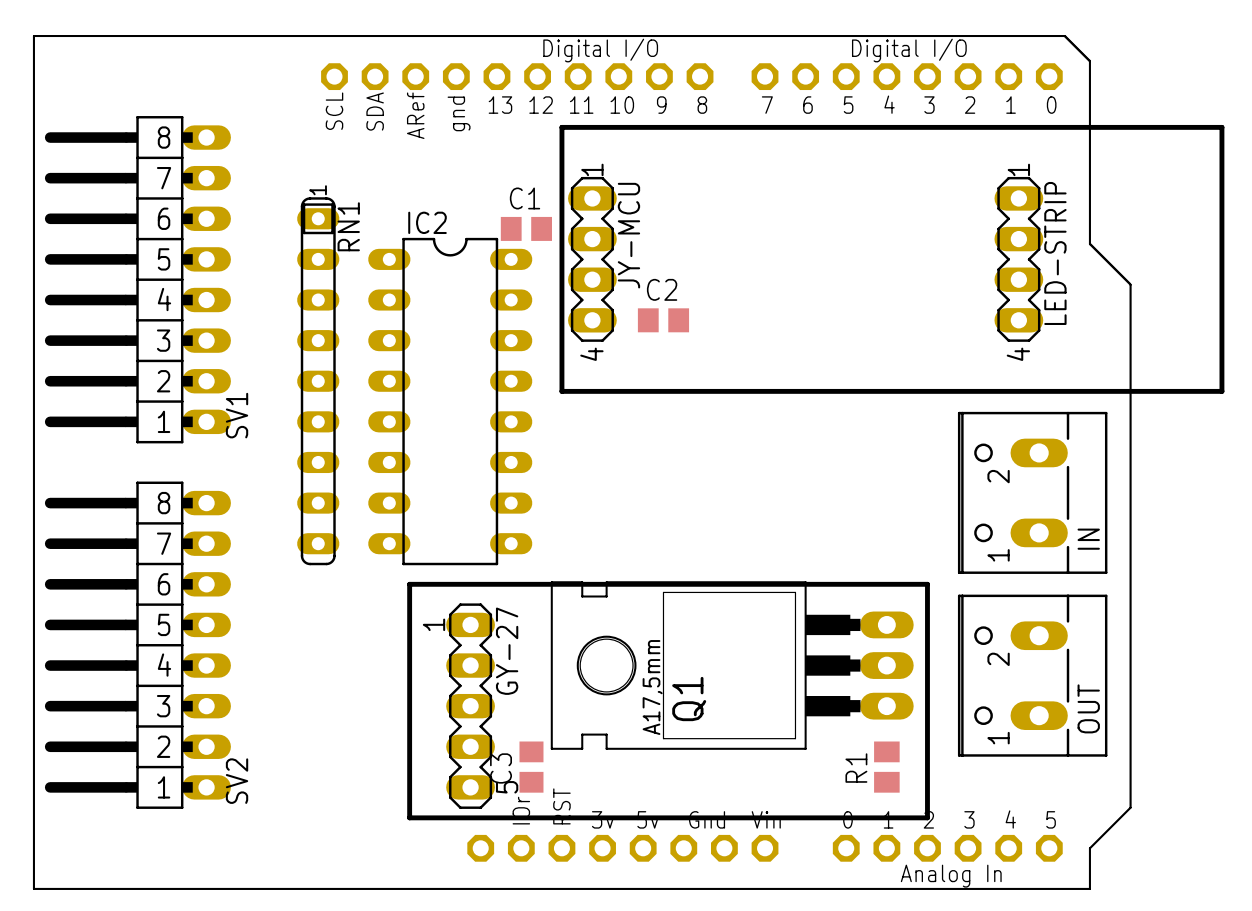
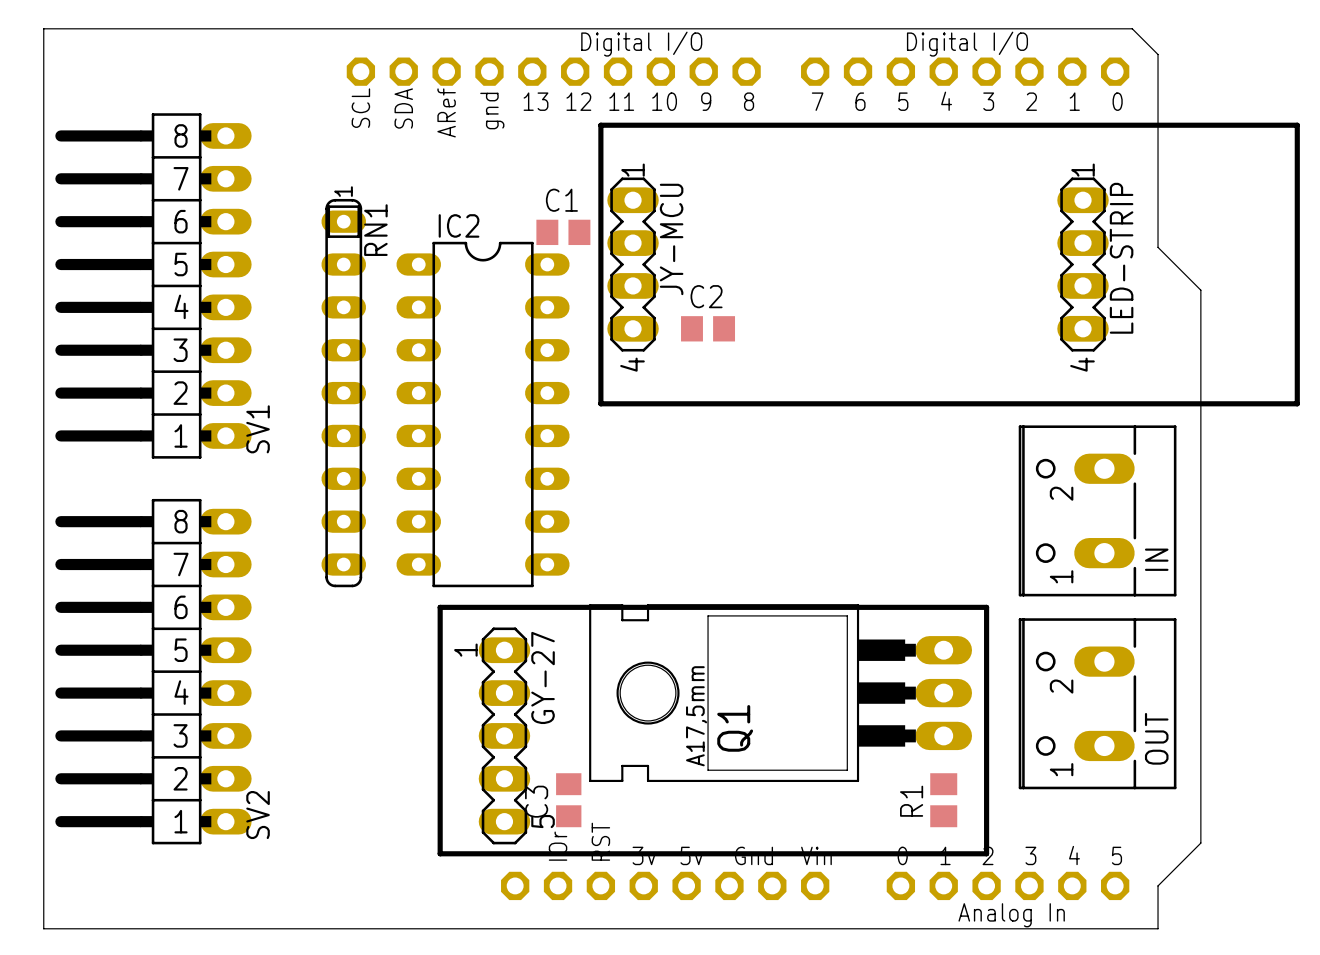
board edge: (33, 36) (33, 888) (1089, 888) (1089, 848) (1130, 807) (1130, 284) (1089, 244) (1089, 61) (1064, 36) (33, 36) -> none

